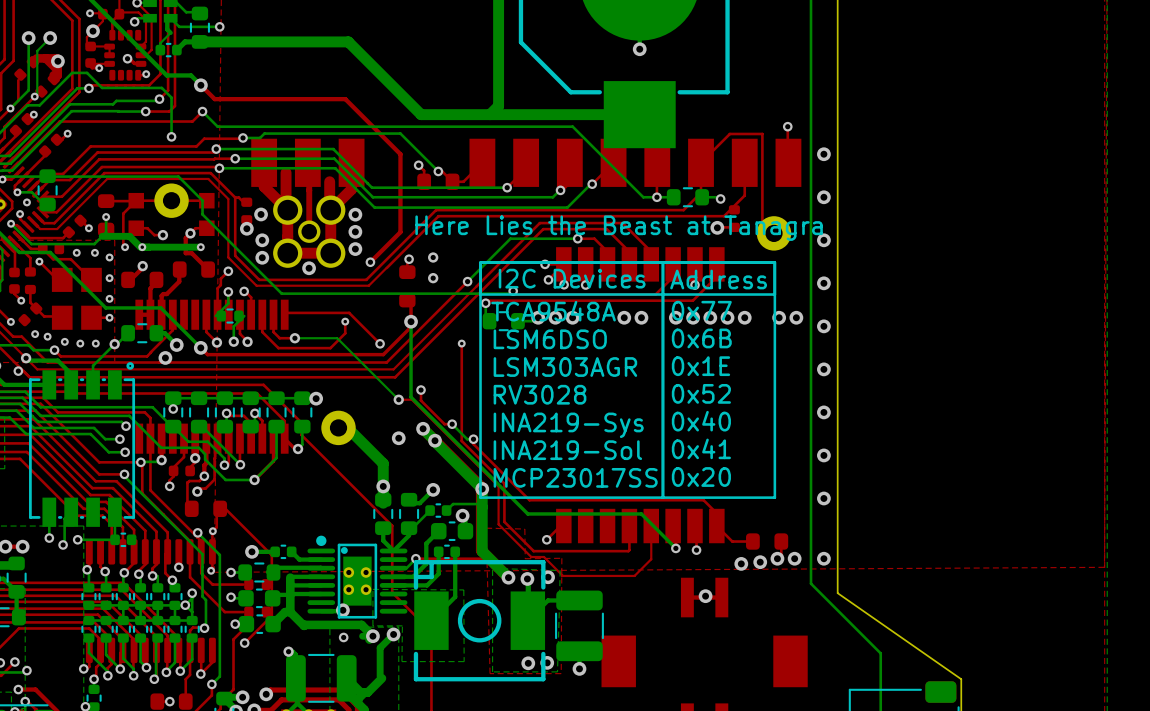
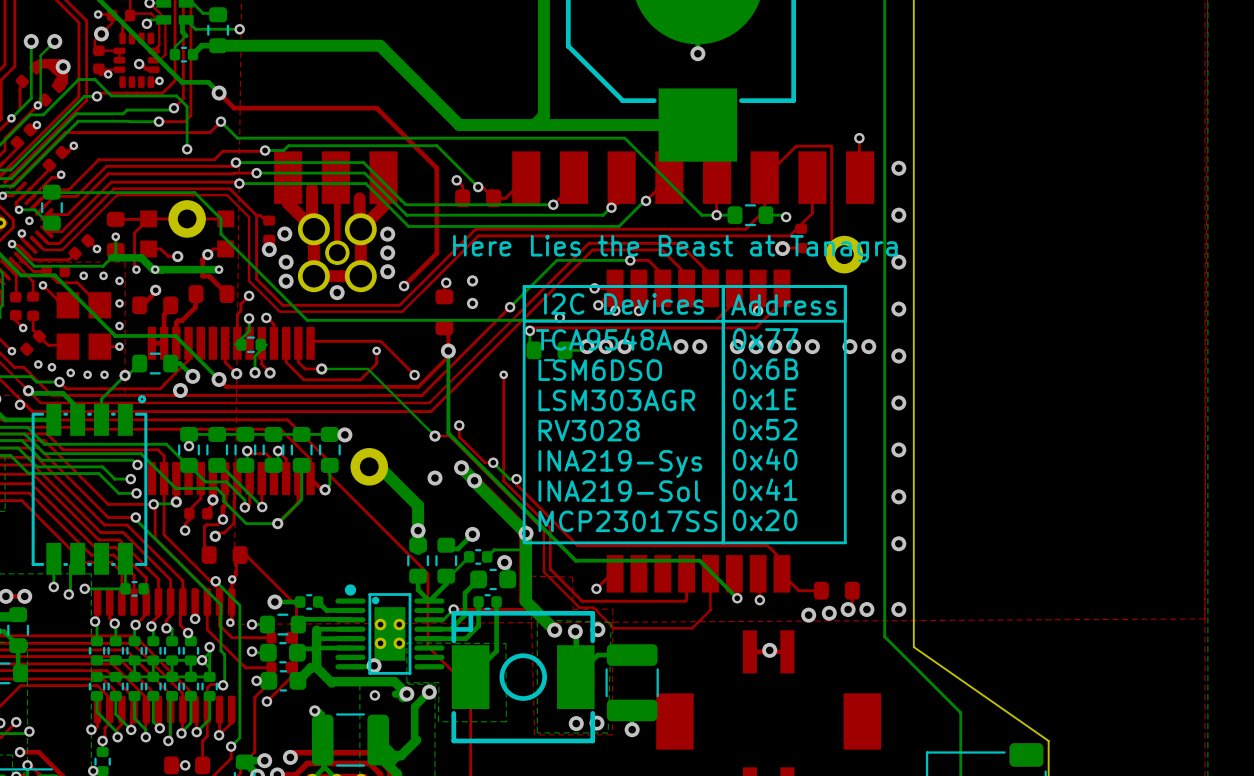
top track: none -> (61, 174) (58, 177) (51, 177) (30, 198)
via: none -> (61, 174)

